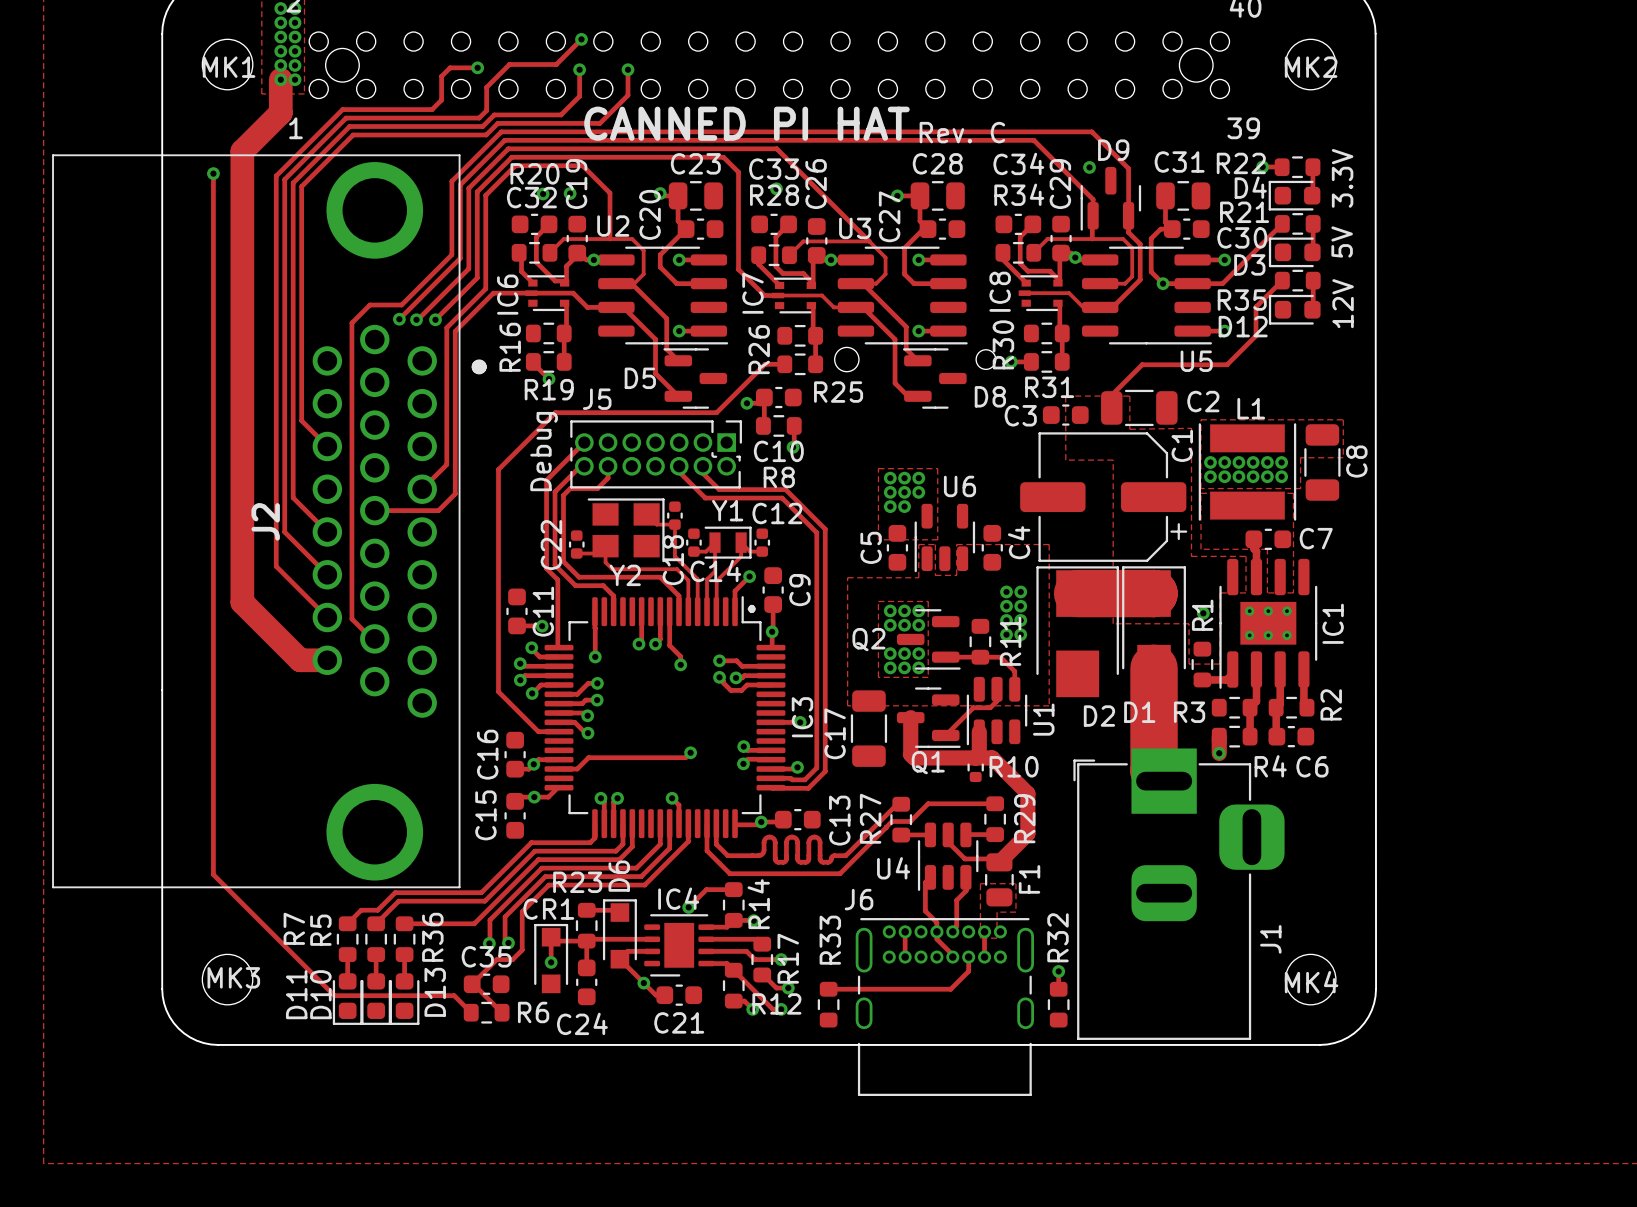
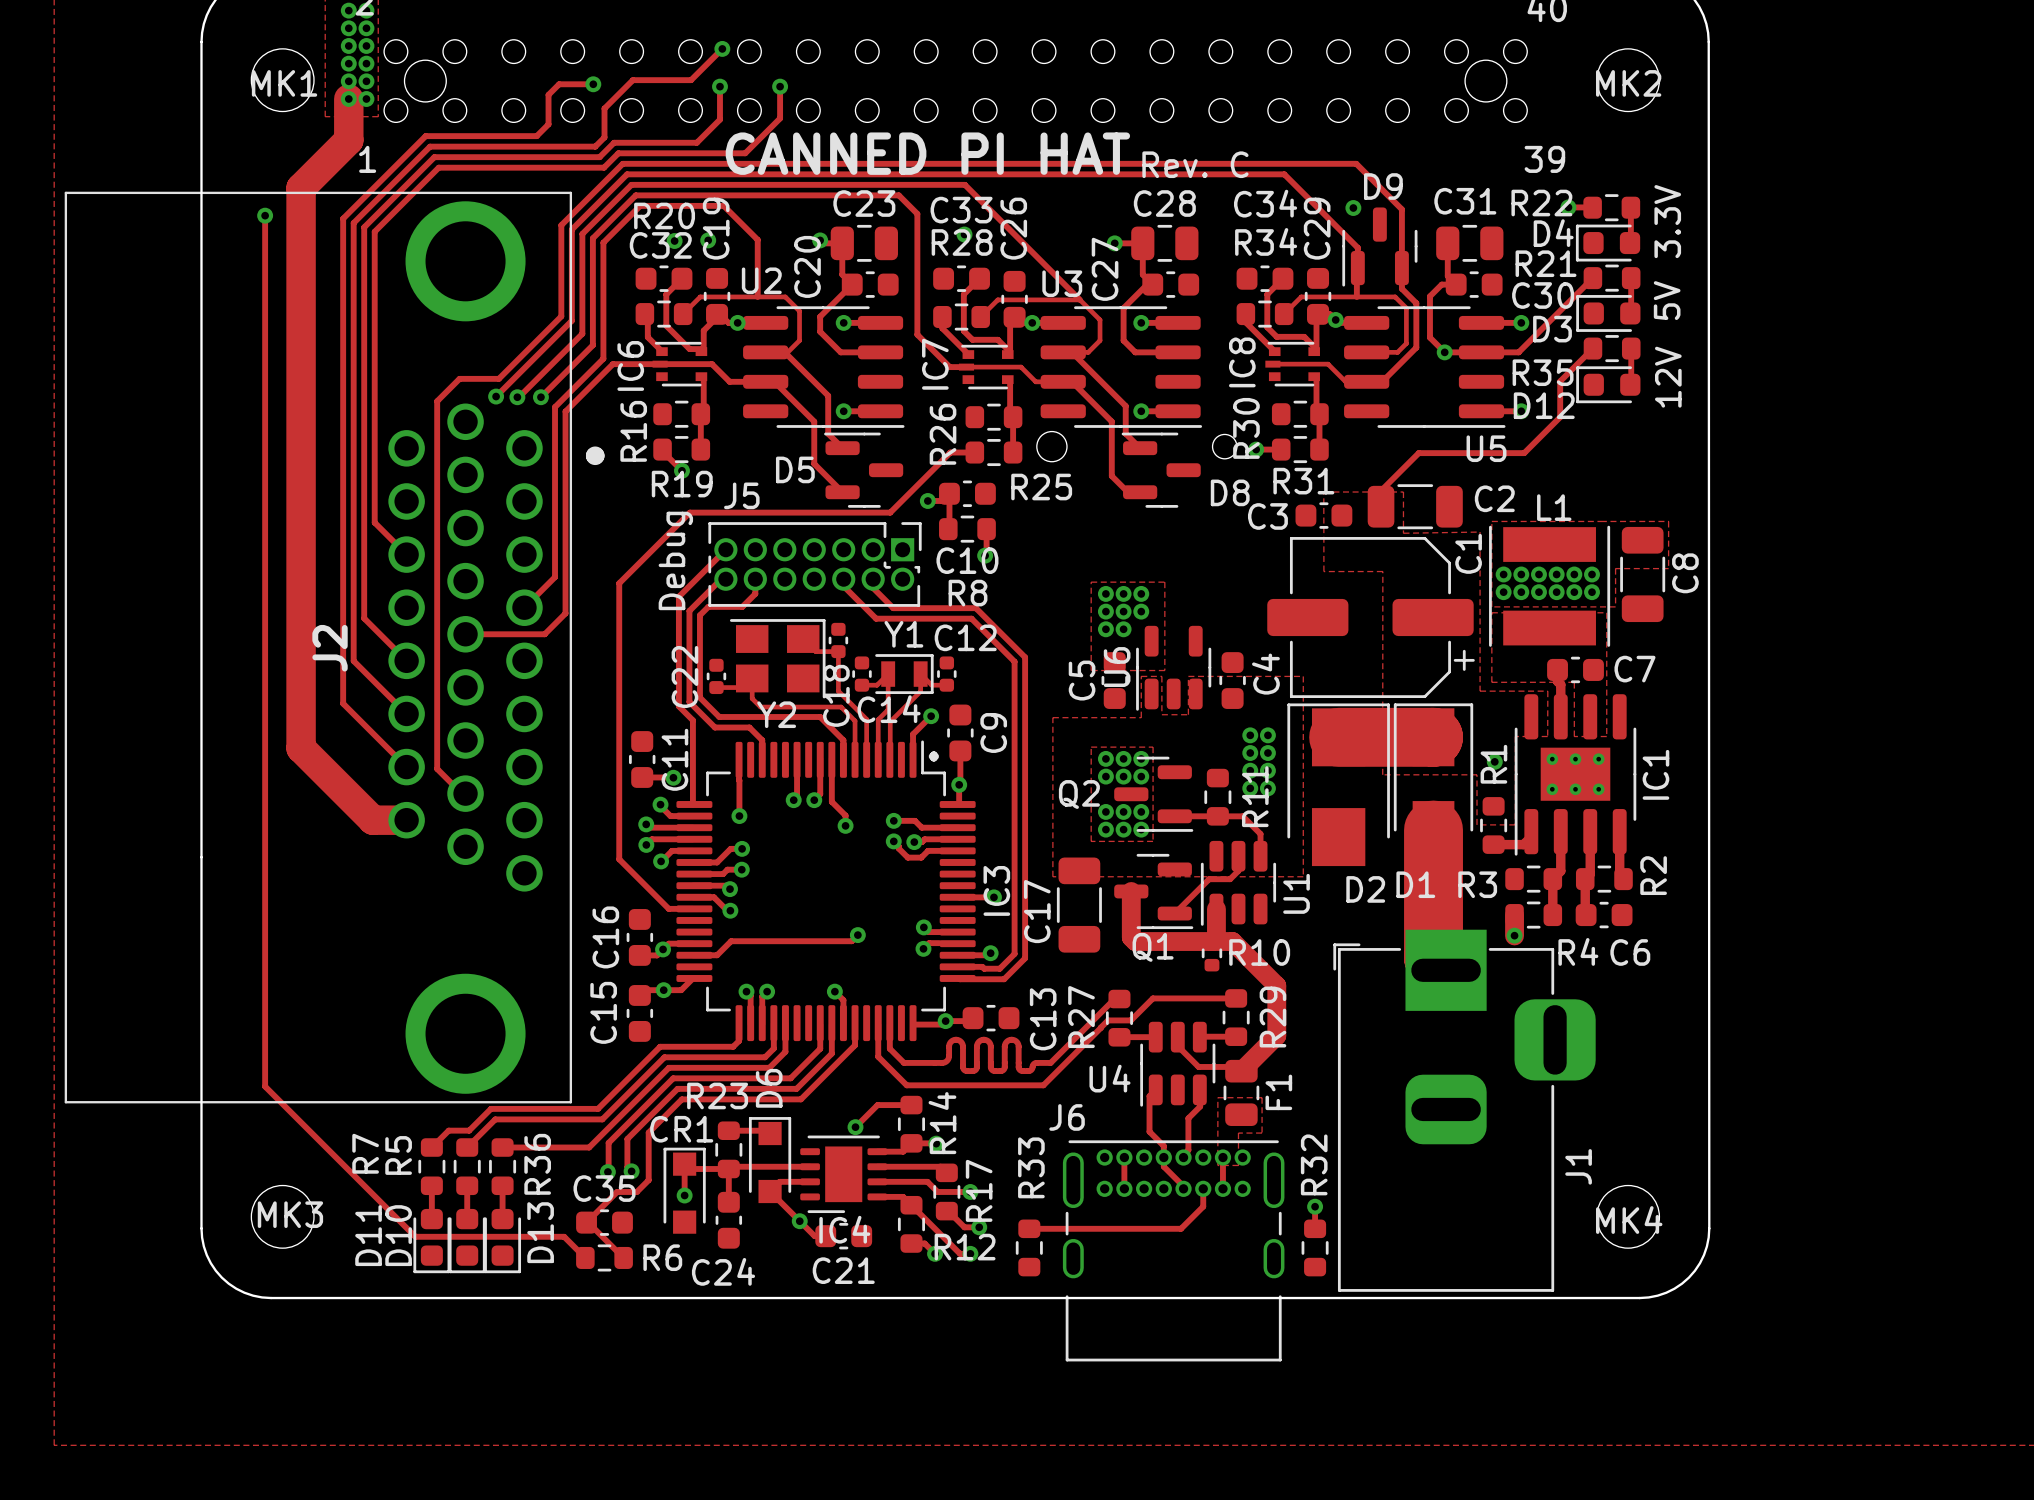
U6 name rotation: 0° (960, 486) -> 90° counterclockwise (1117, 667)
U6 name position: U6 (960, 486) -> U6 (1117, 667)
IC4 name position: IC4 (678, 898) -> IC4 (844, 1229)

